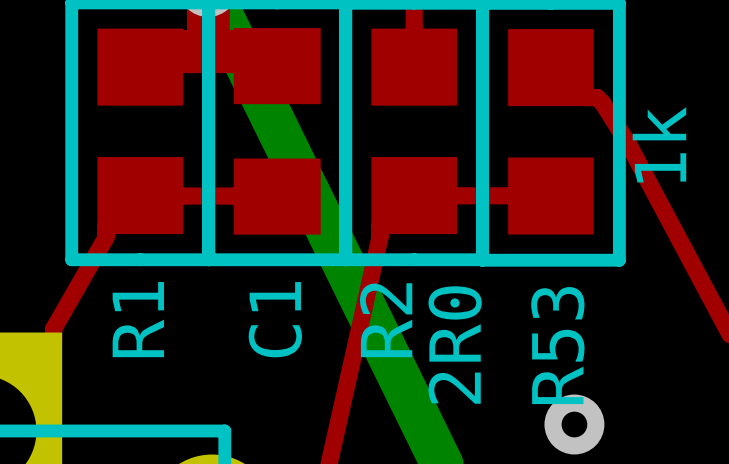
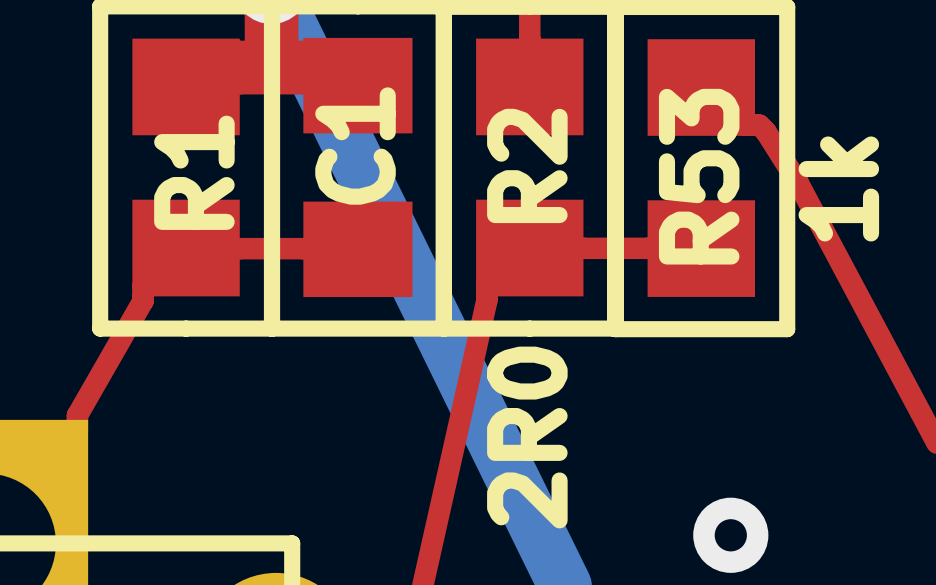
R1 name position: R1 (138, 319) -> R1 (194, 172)
C1 name position: C1 (275, 319) -> C1 (355, 146)
R2 name position: R2 (386, 320) -> R2 (527, 165)
R2 value position: 2R0 (455, 345) -> 2R0 (527, 437)
R53 name position: R53 (557, 345) -> R53 (699, 176)

